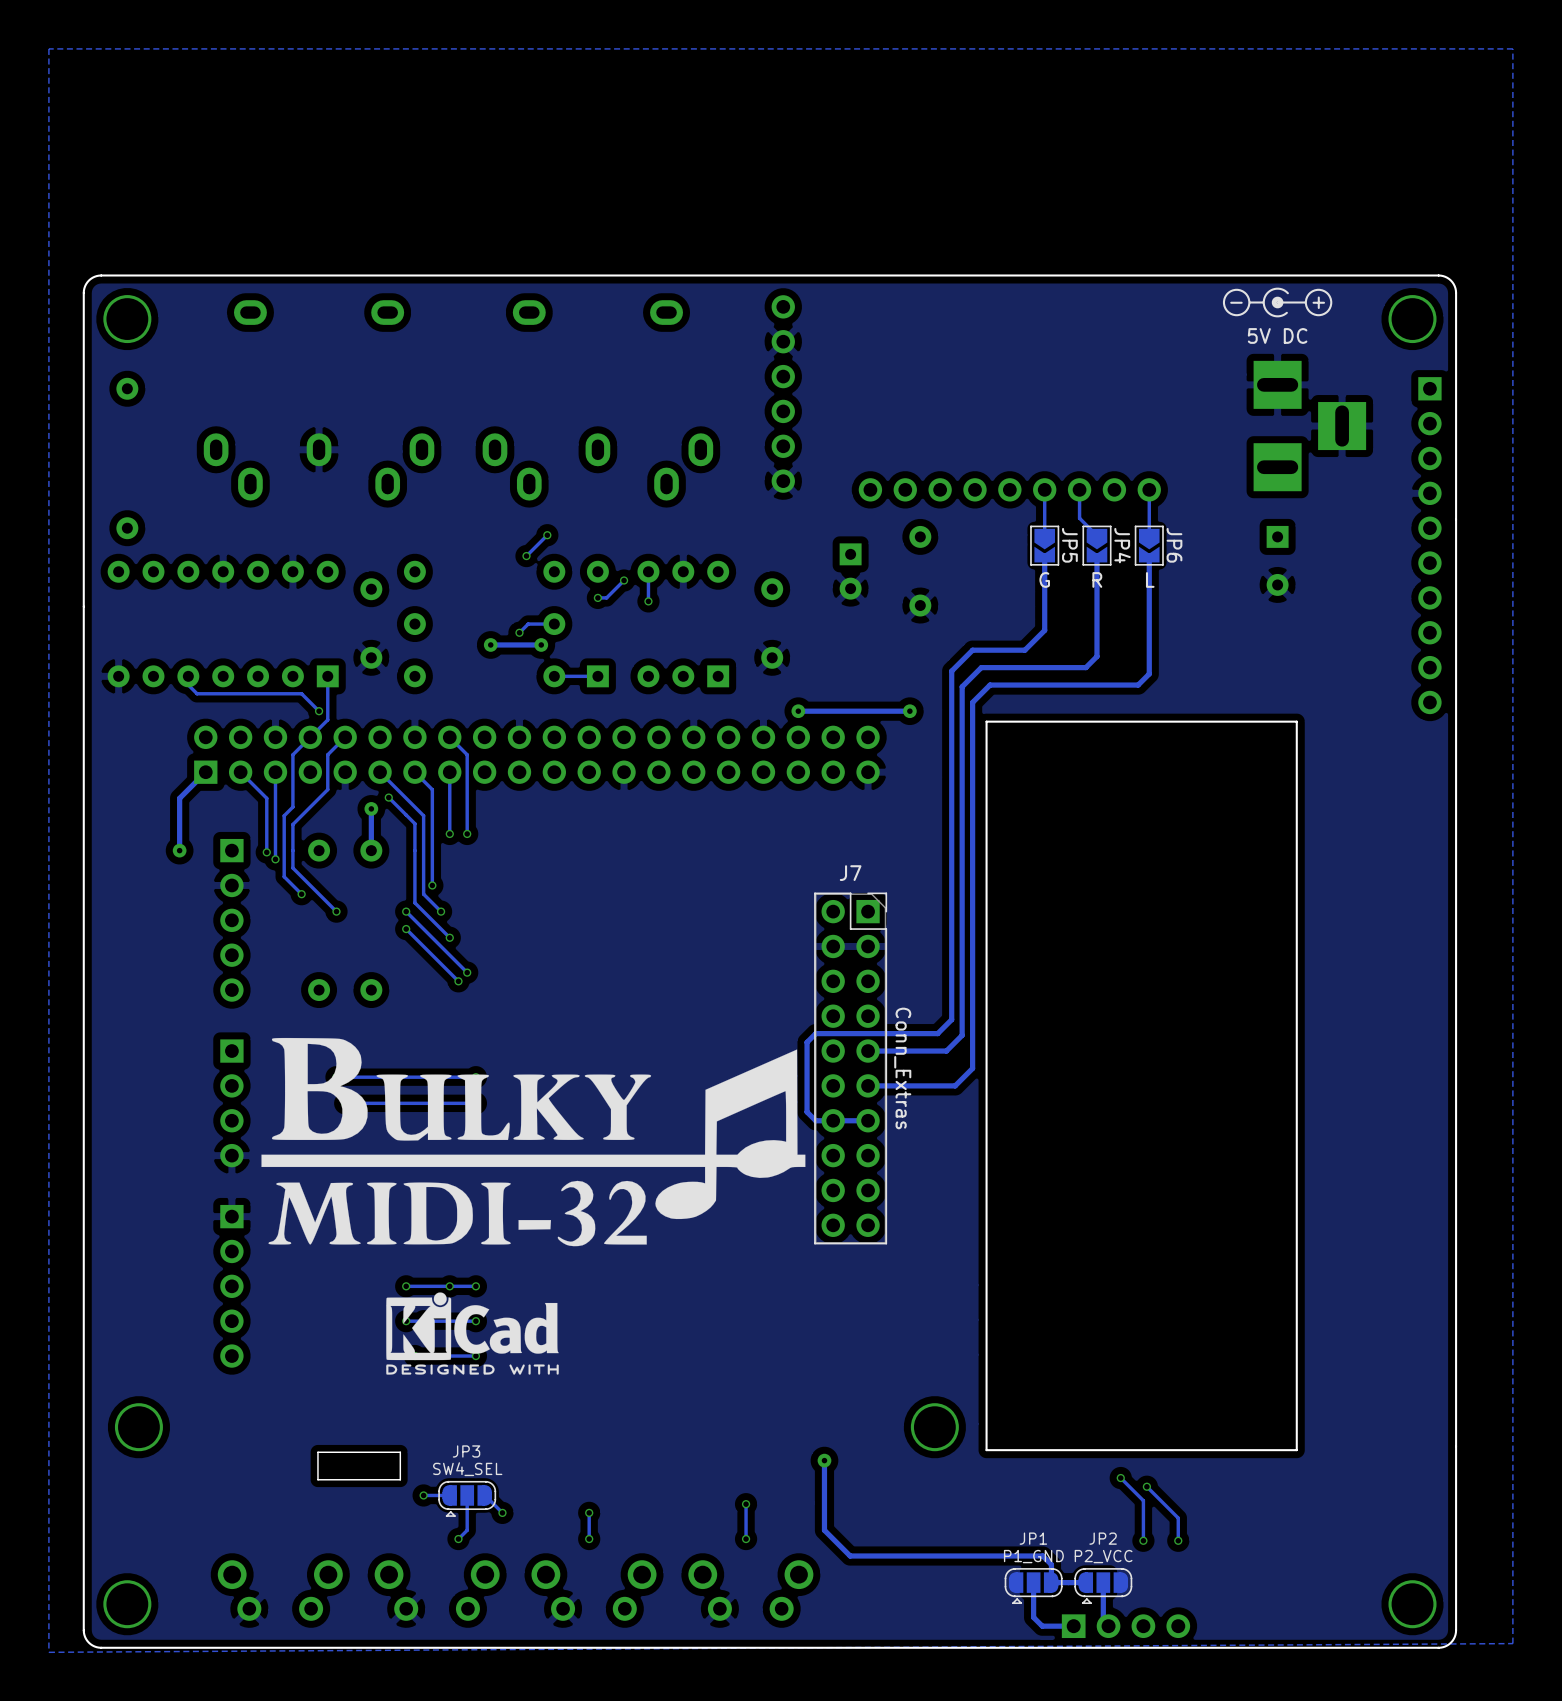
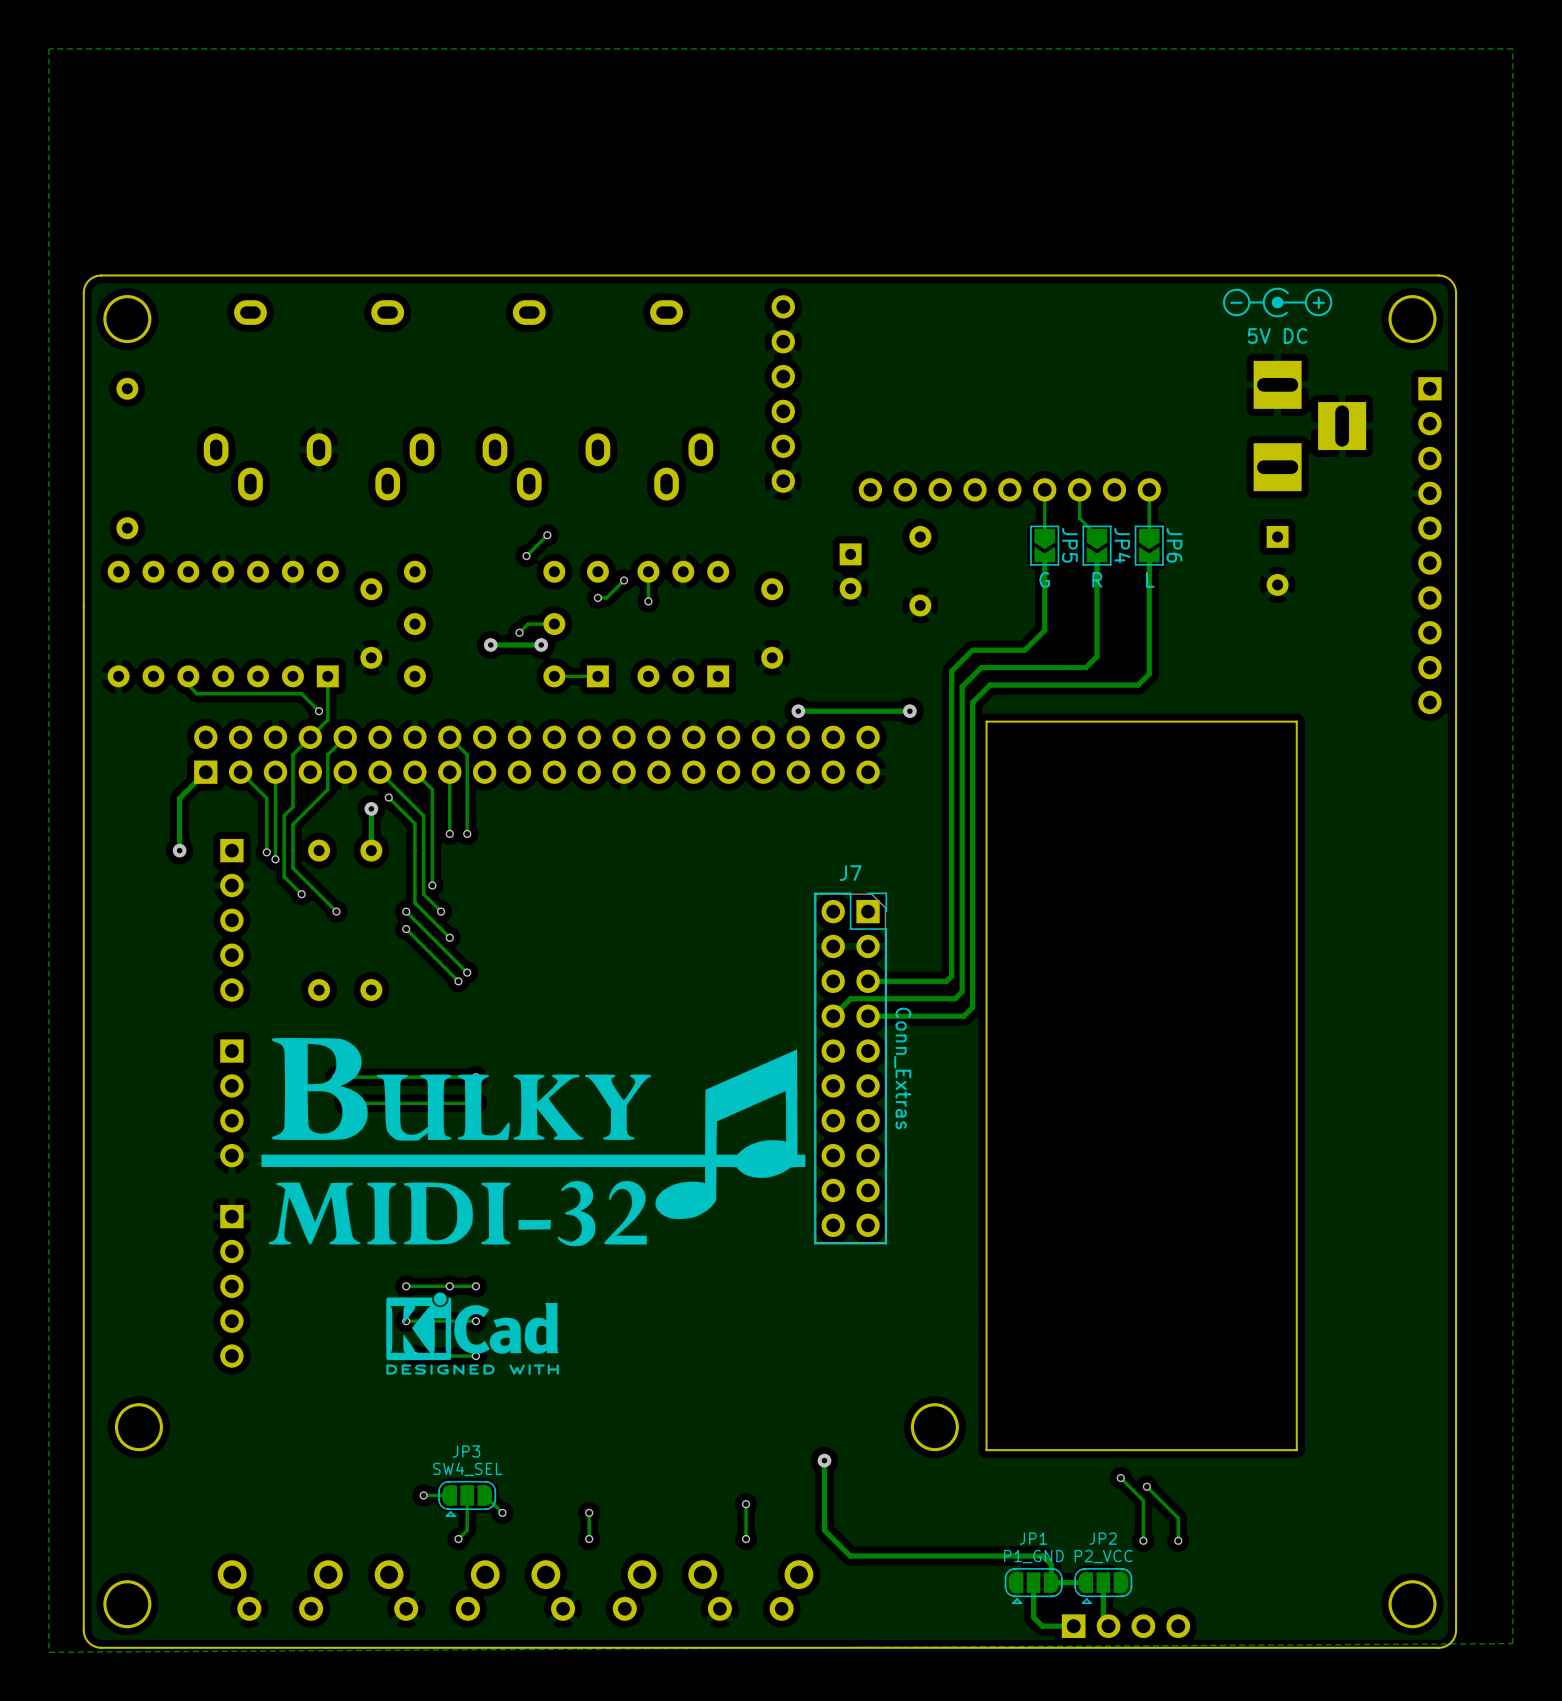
track: (951, 976) (951, 1019) (937, 1033) (815, 1033) (807, 1042) (807, 1112) (815, 1120) (868, 1120) -> (951, 976) (946, 981) (868, 981)
track: (962, 991) (962, 1035) (946, 1051) (868, 1051) -> (962, 991) (955, 998) (850, 998) (833, 1016)
track: (972, 1007) (972, 1068) (955, 1085) (868, 1085) -> (972, 1007) (963, 1016) (868, 1016)
board edge: (400, 1452) (317, 1452) (317, 1479) (400, 1479) (400, 1452) -> none

